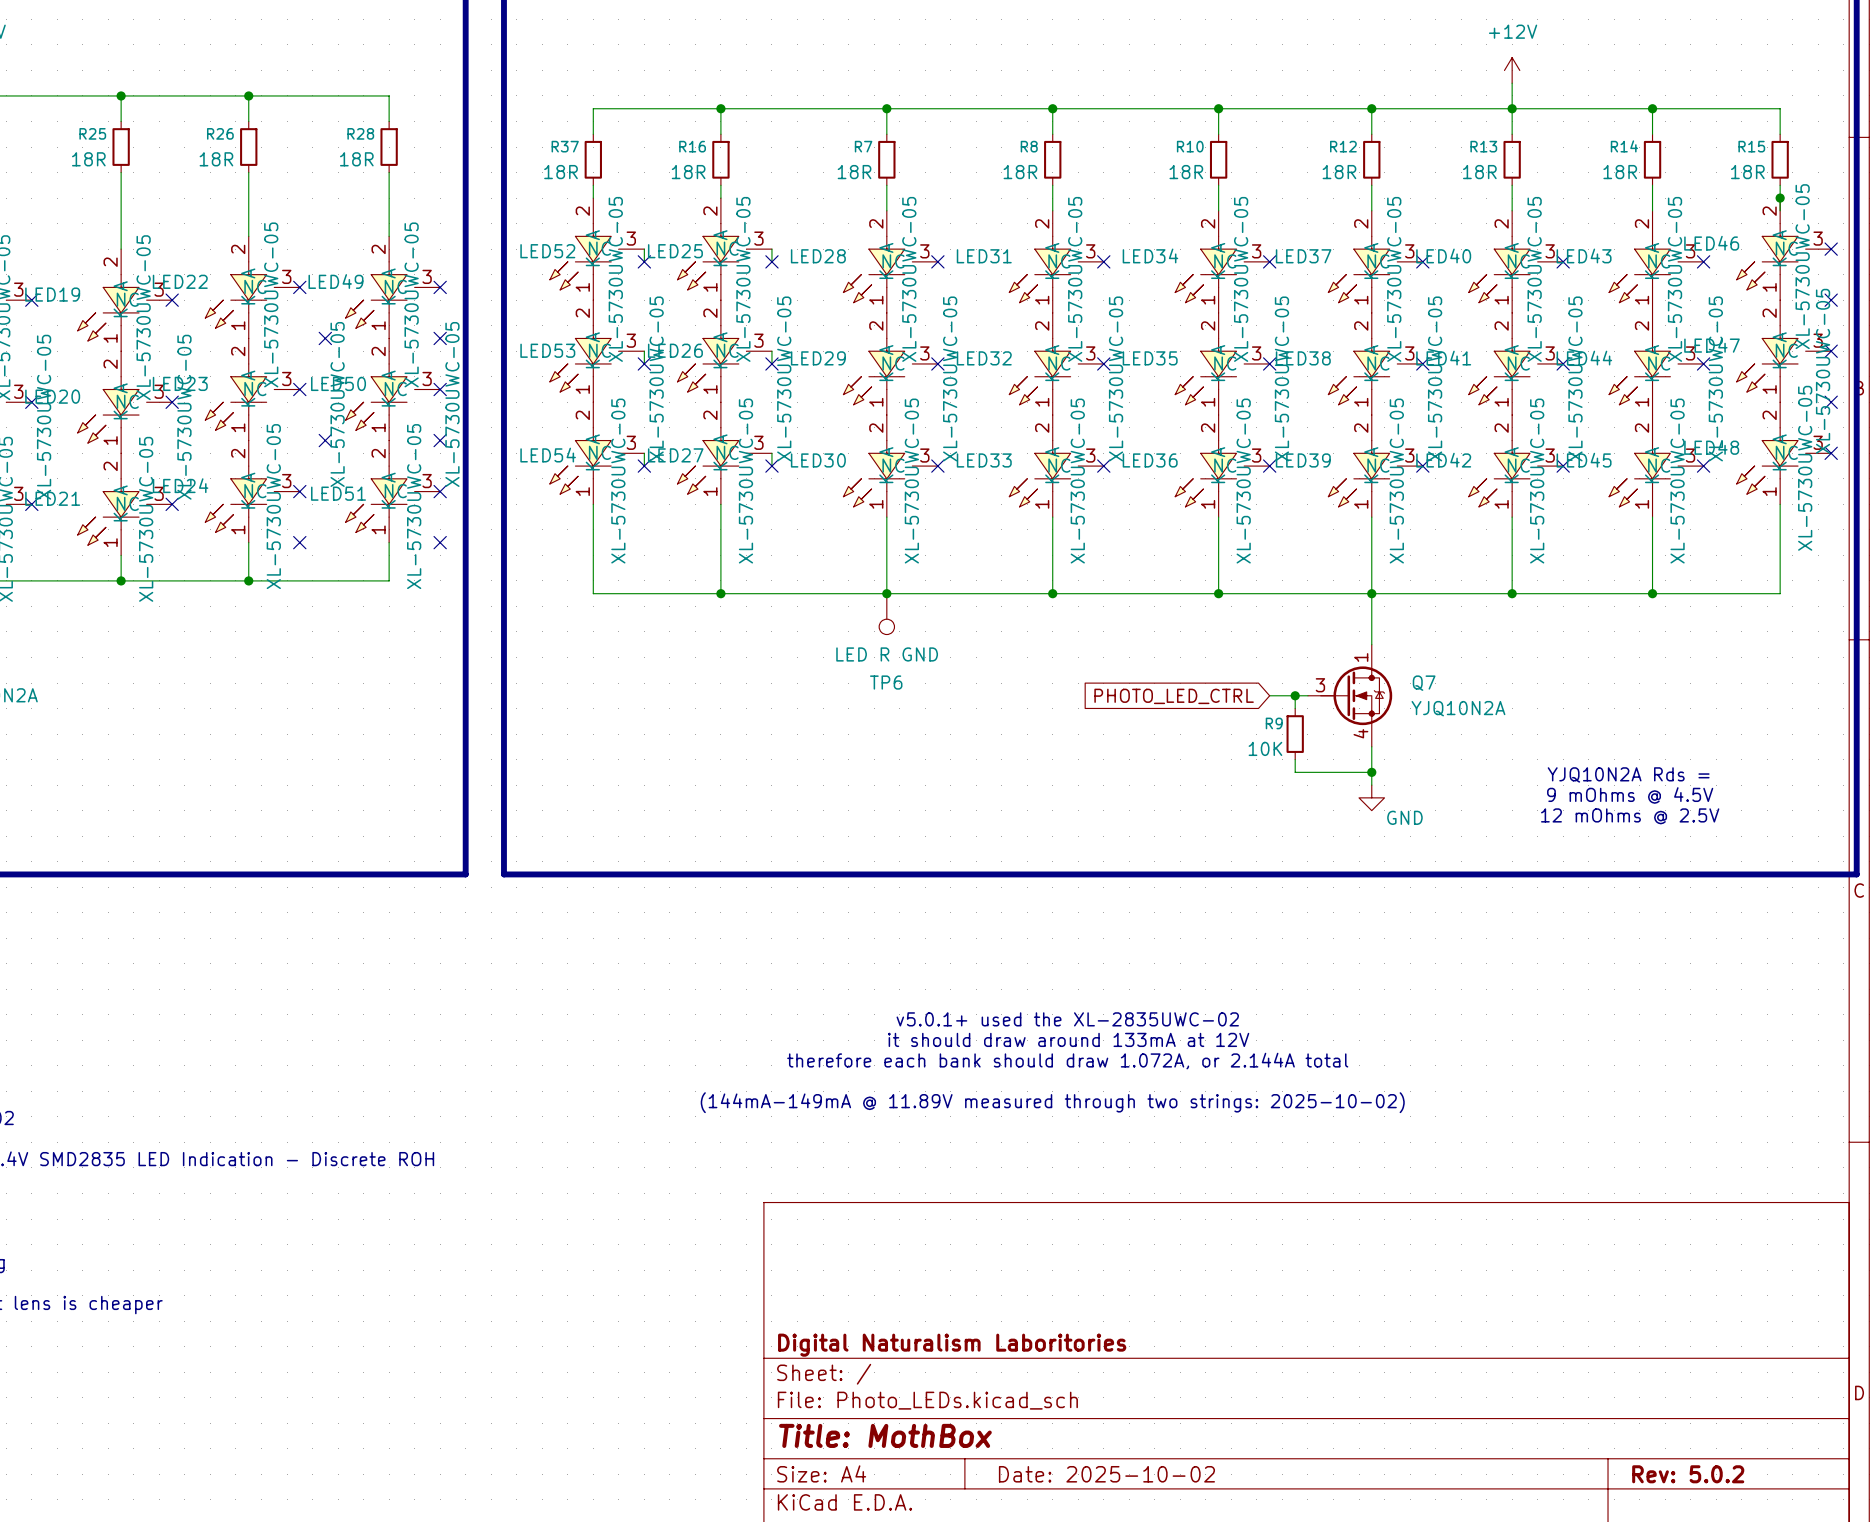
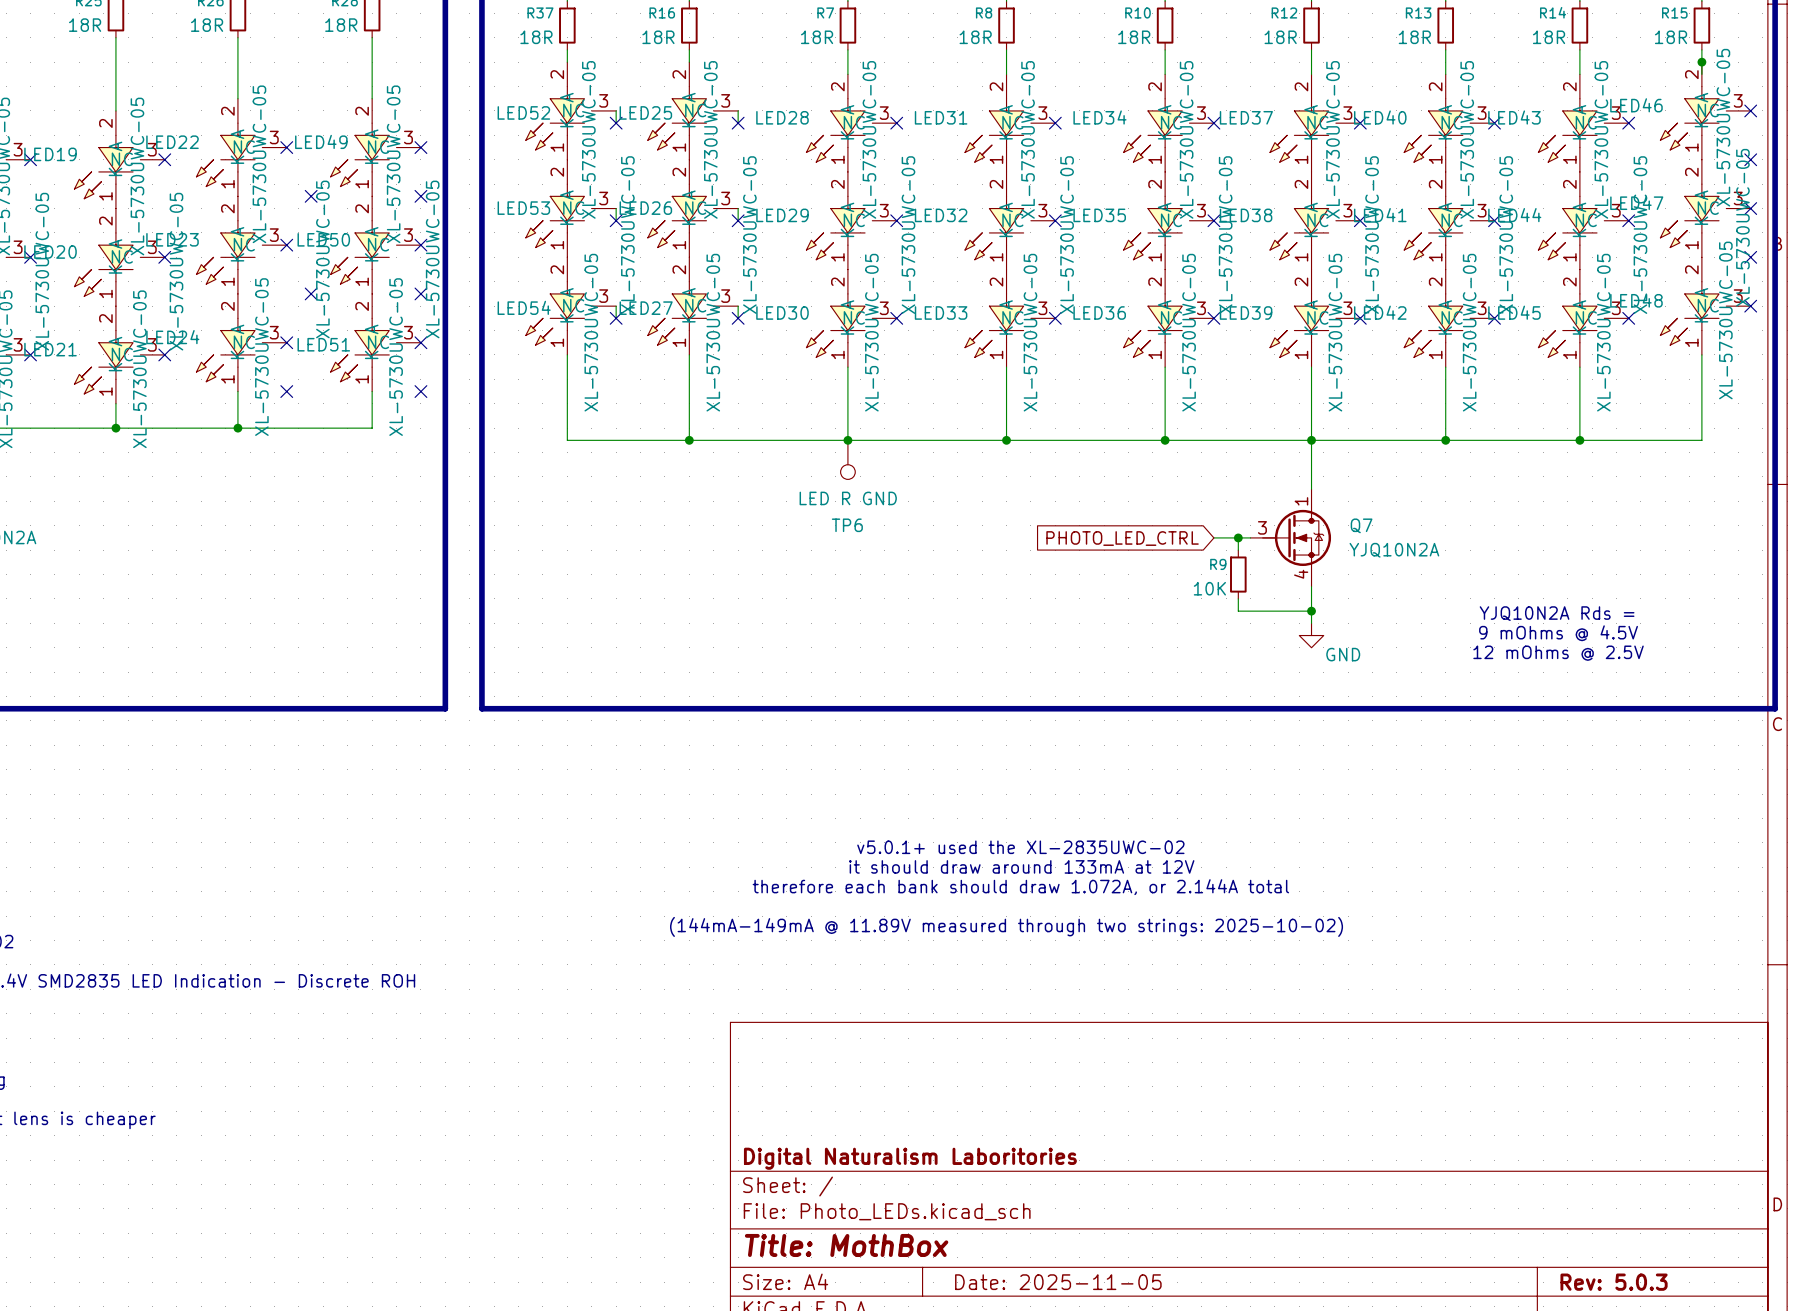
title block: Date: 2025-10-02 (1106, 1474) -> Date: 2025-11-05 (1058, 1282)
title block: Rev: 5.0.2 (1688, 1474) -> Rev: 5.0.3 (1614, 1282)

